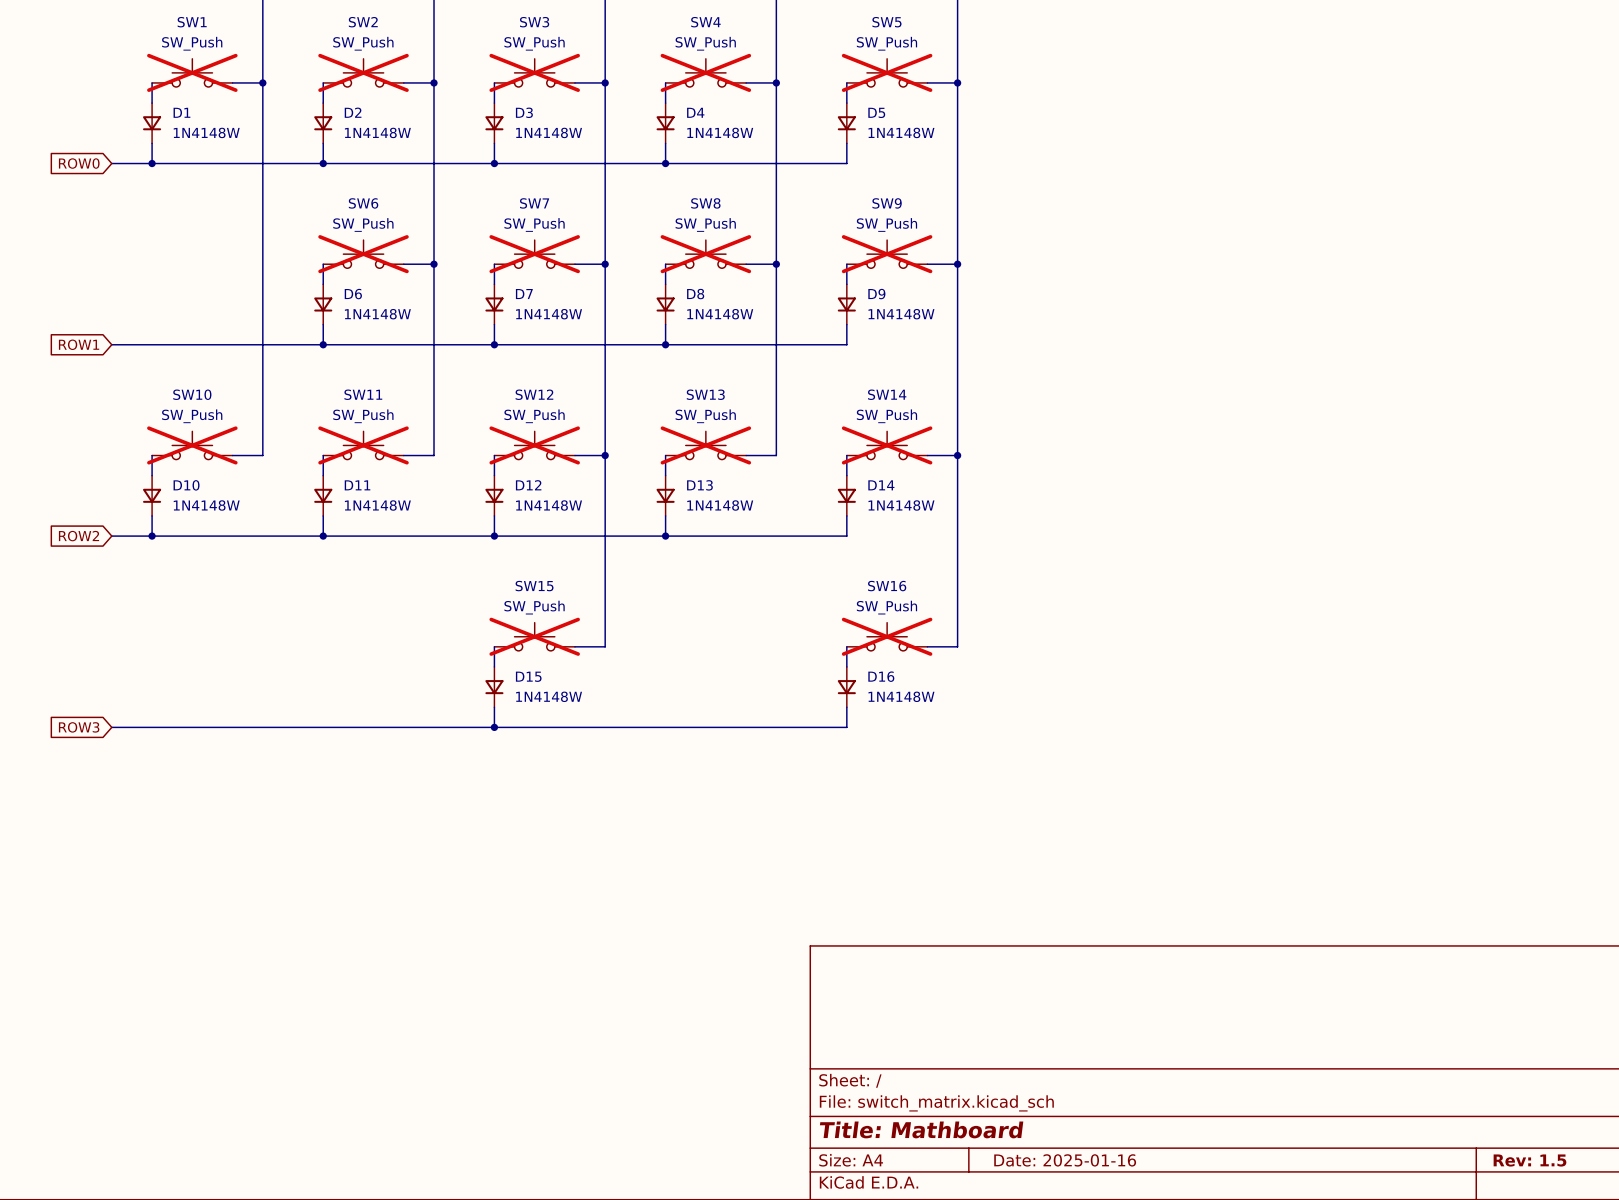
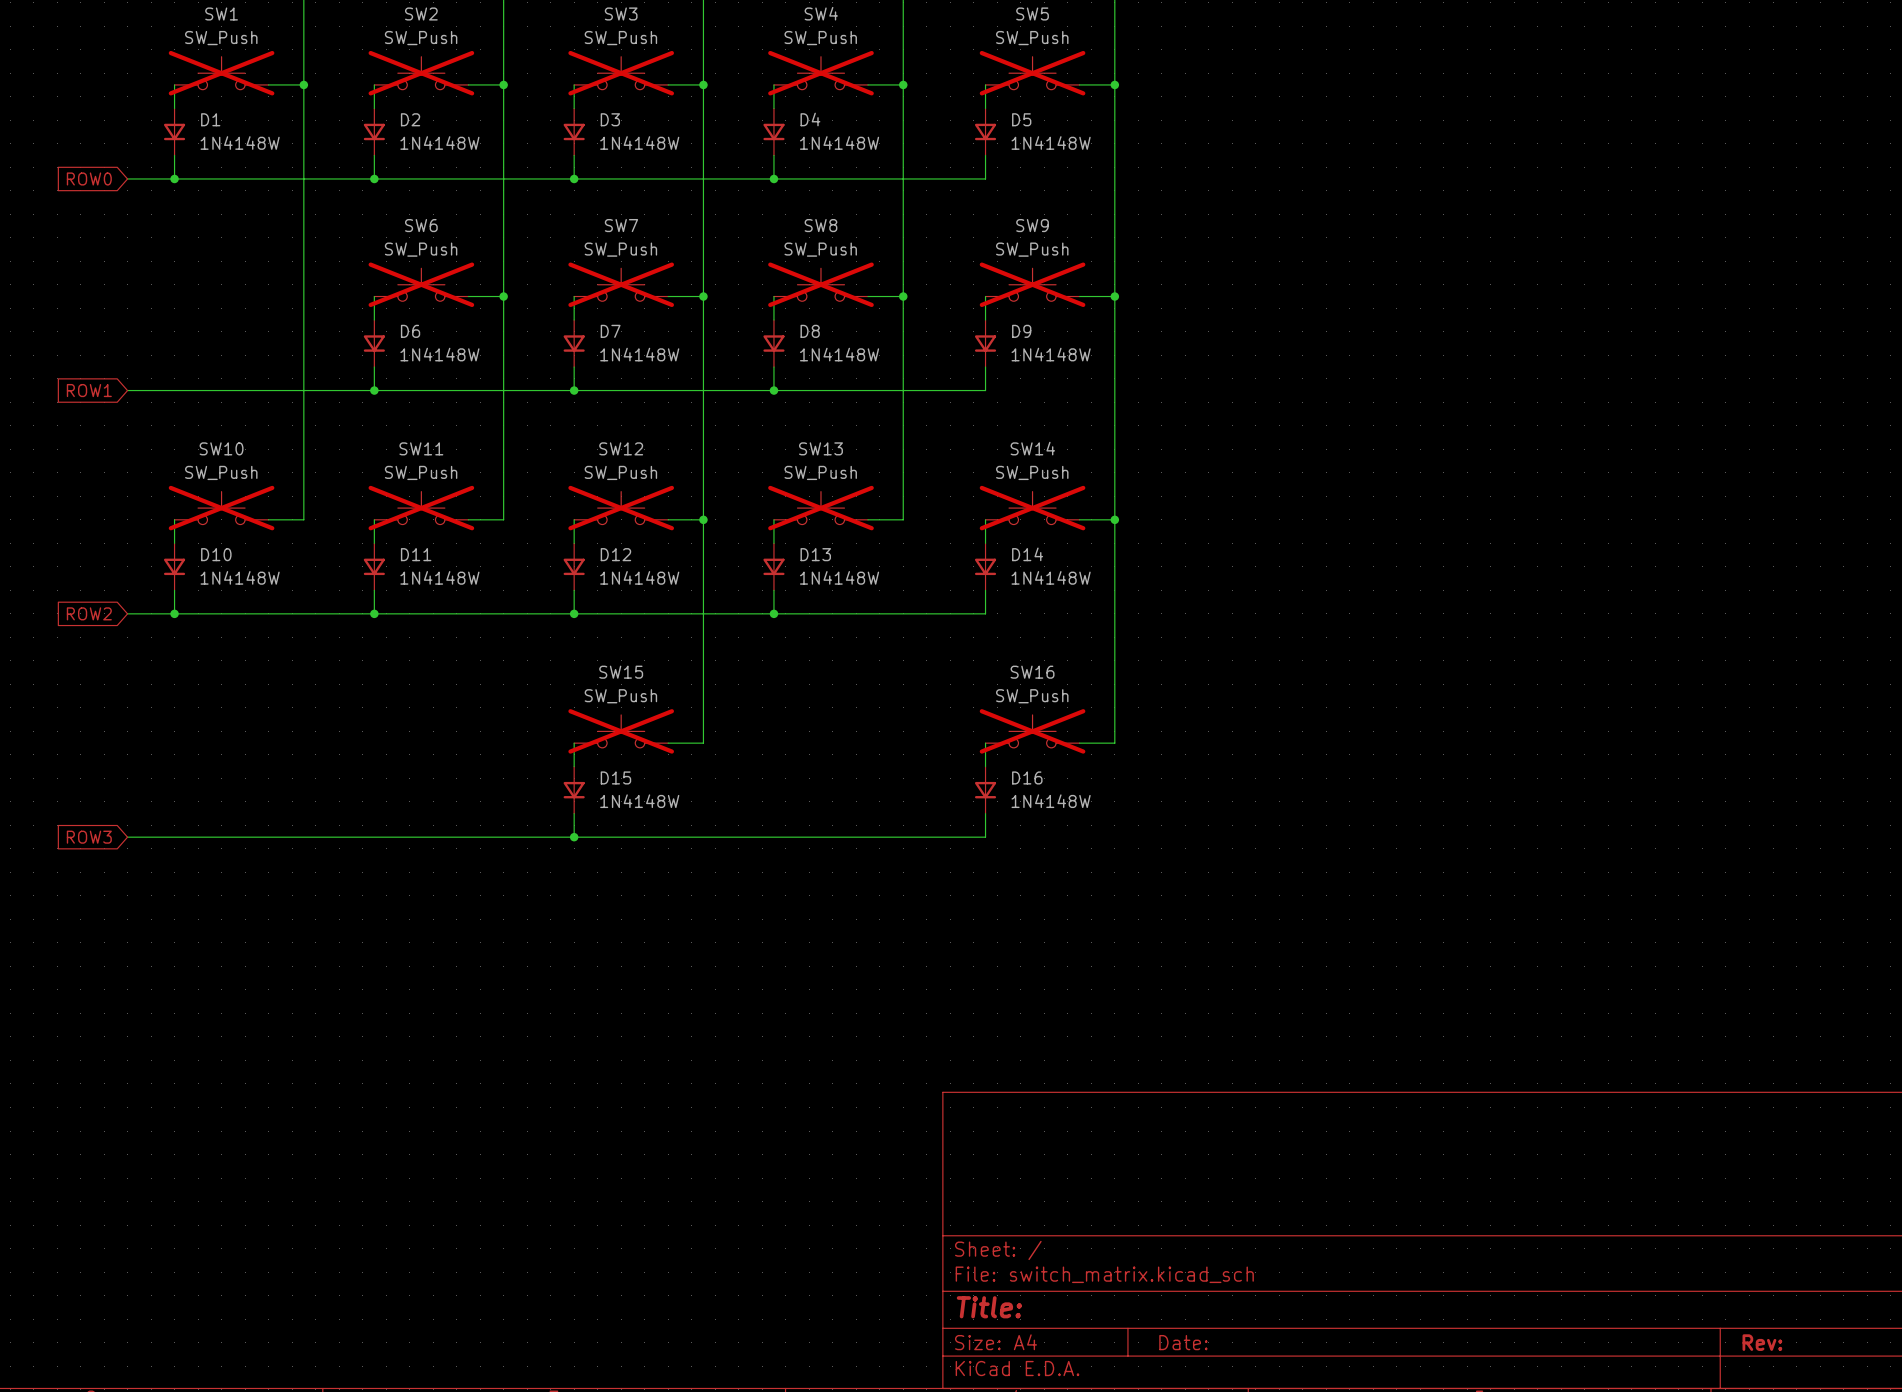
title block: Title: Mathboard (921, 1129) -> Title: (989, 1307)
title block: Date: 2025-01-16 (1065, 1160) -> Date: (1183, 1342)
title block: Rev: 1.5 (1529, 1160) -> Rev: (1762, 1342)

